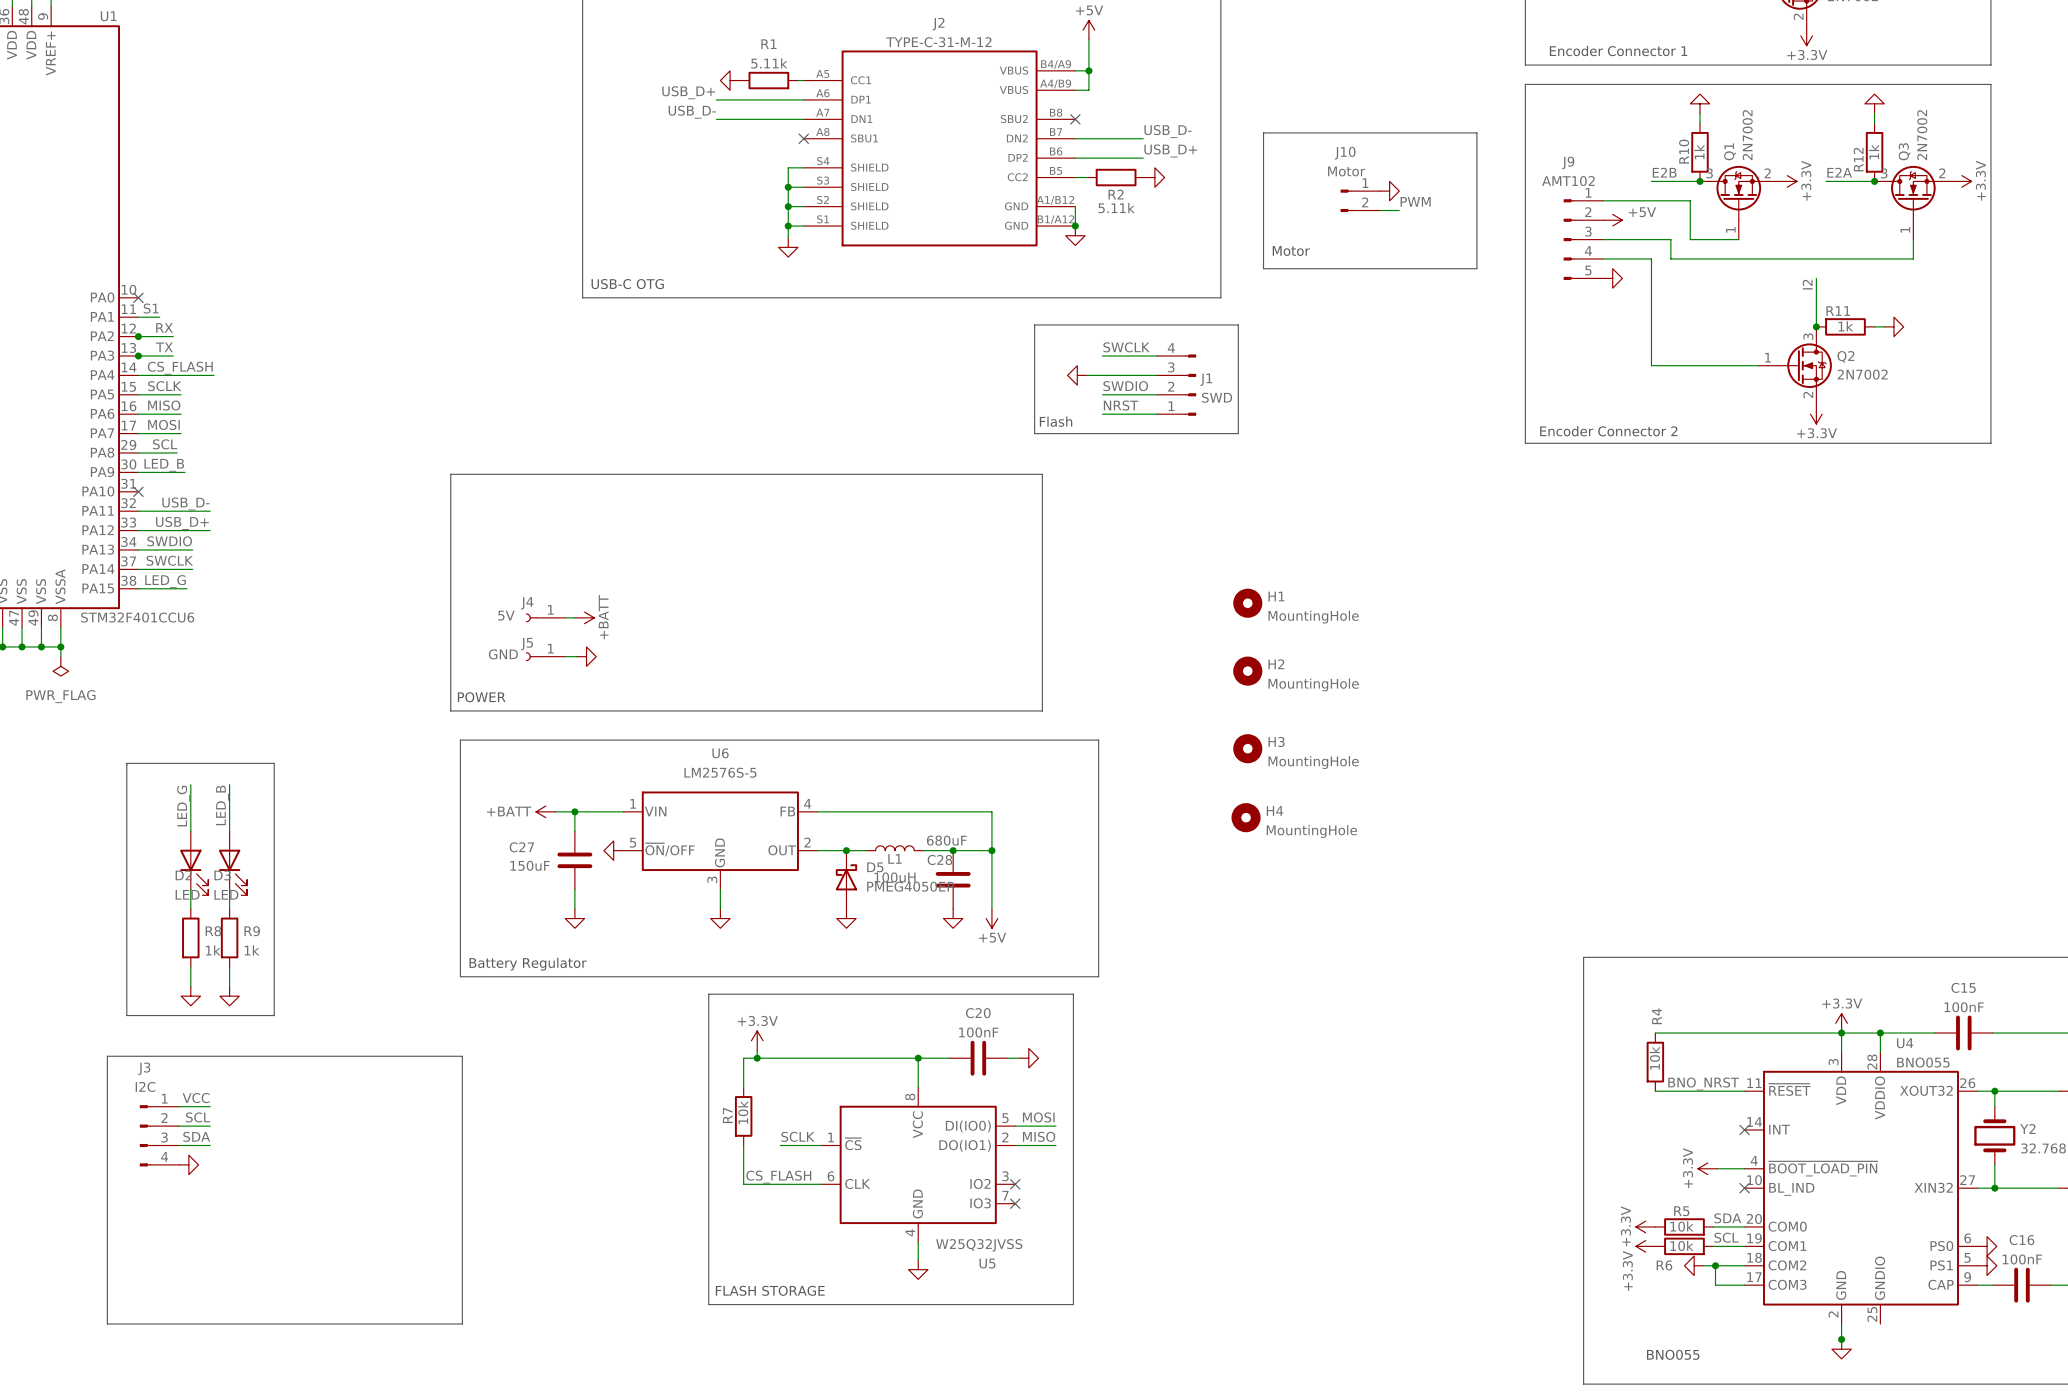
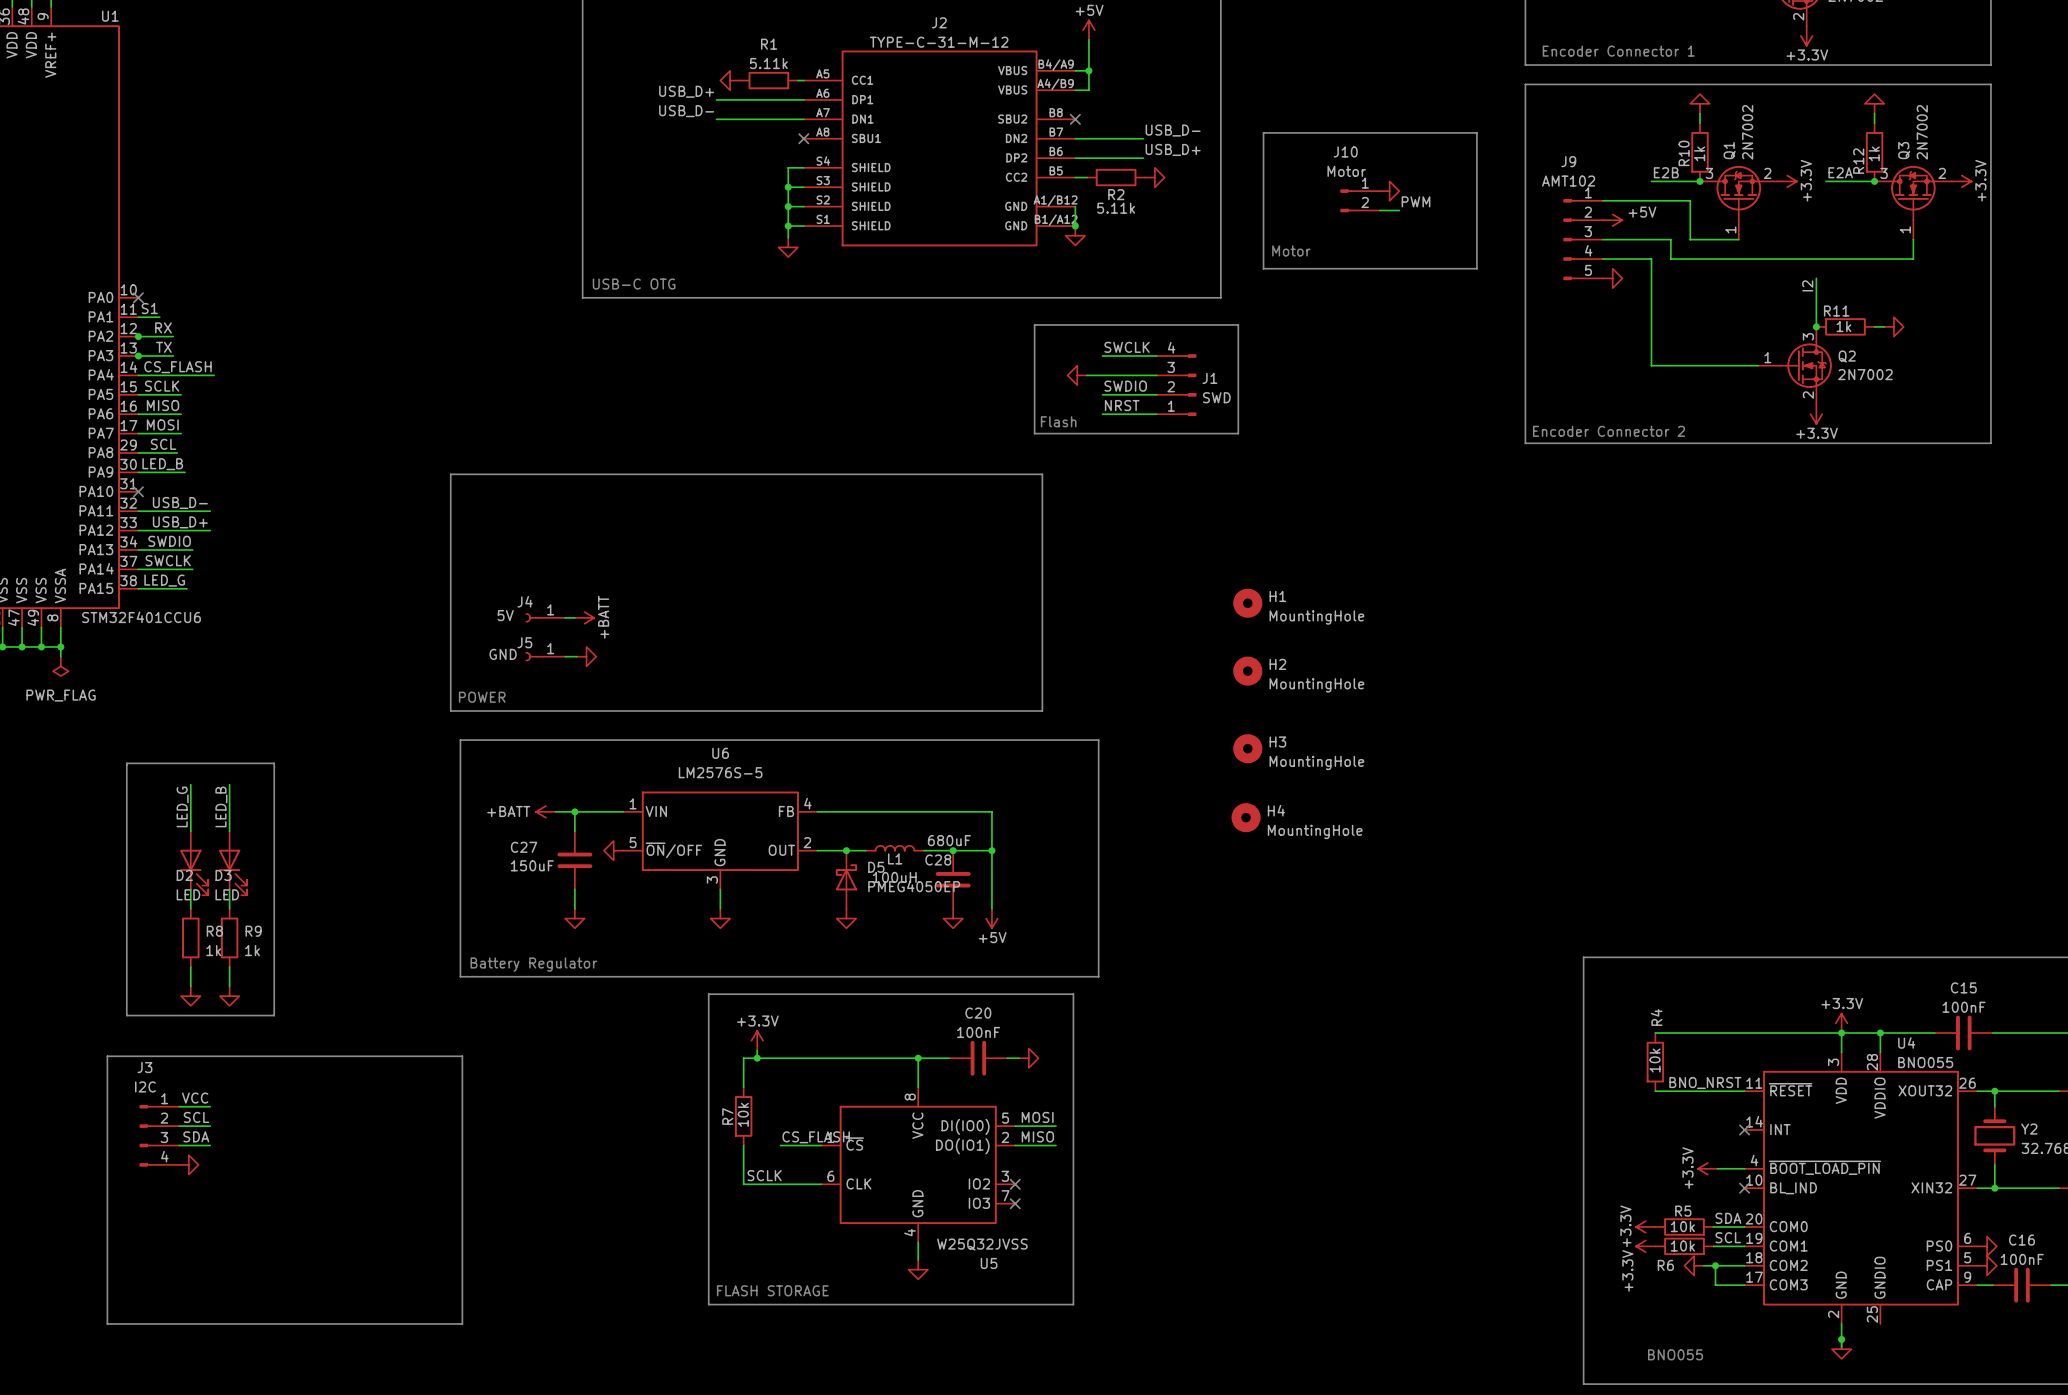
label: SCLK (798, 1136) -> CS_FLASH (816, 1137)
label: CS_FLASH (778, 1177) -> SCLK (764, 1175)

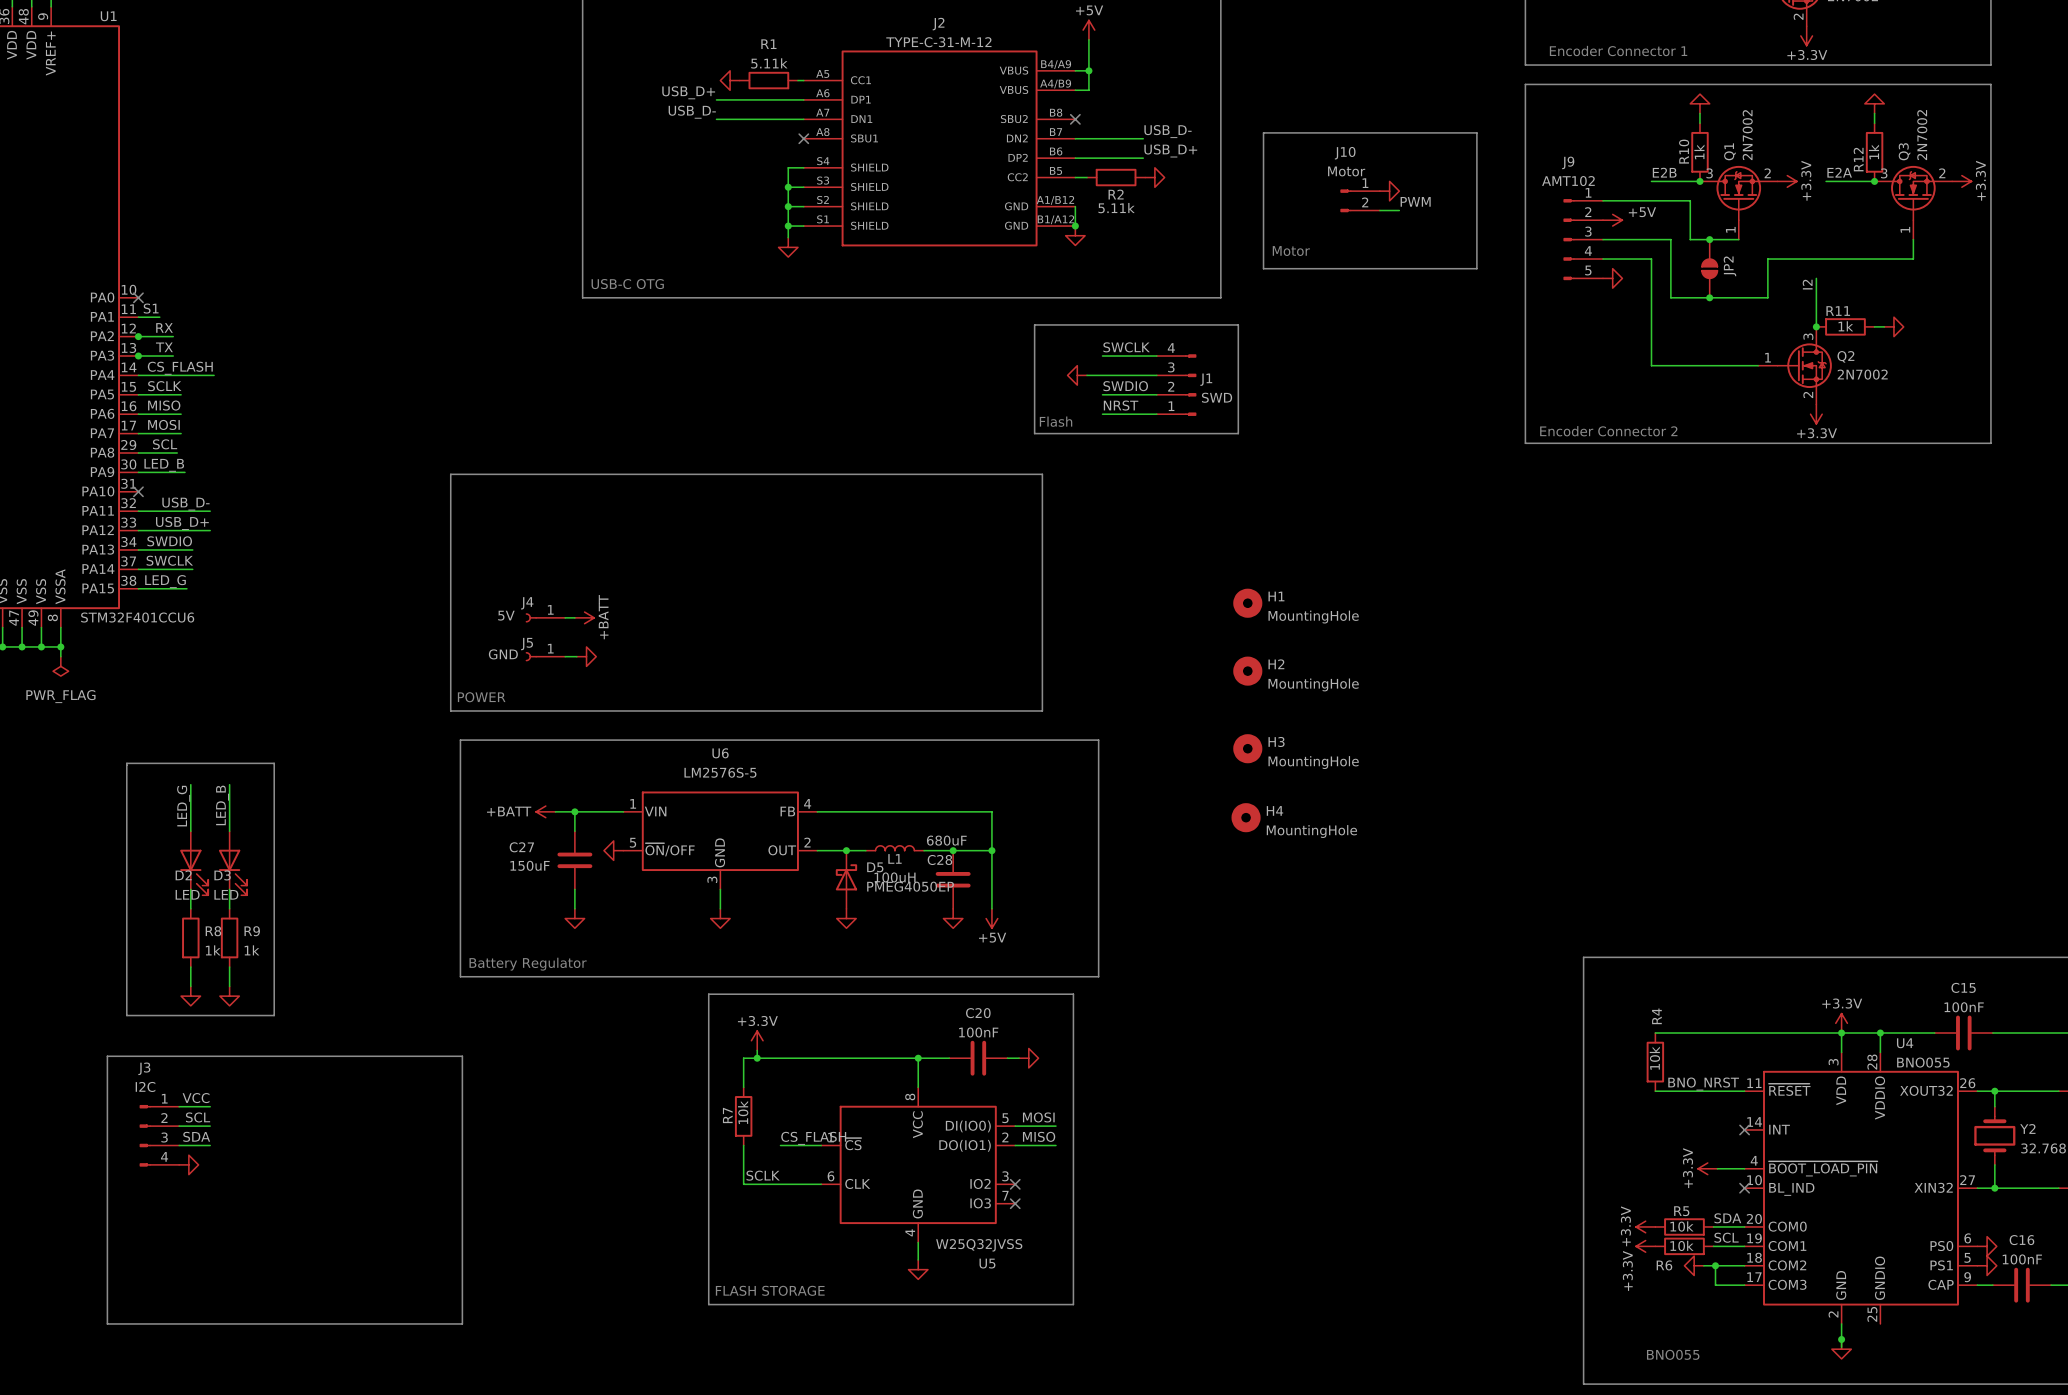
junction: none -> (1709, 239)
wire: (1670, 259) (1767, 259) -> (1670, 259) (1670, 297) (1767, 297) (1767, 259)
JP2: none -> (1709, 268)
junction: none -> (1709, 297)

